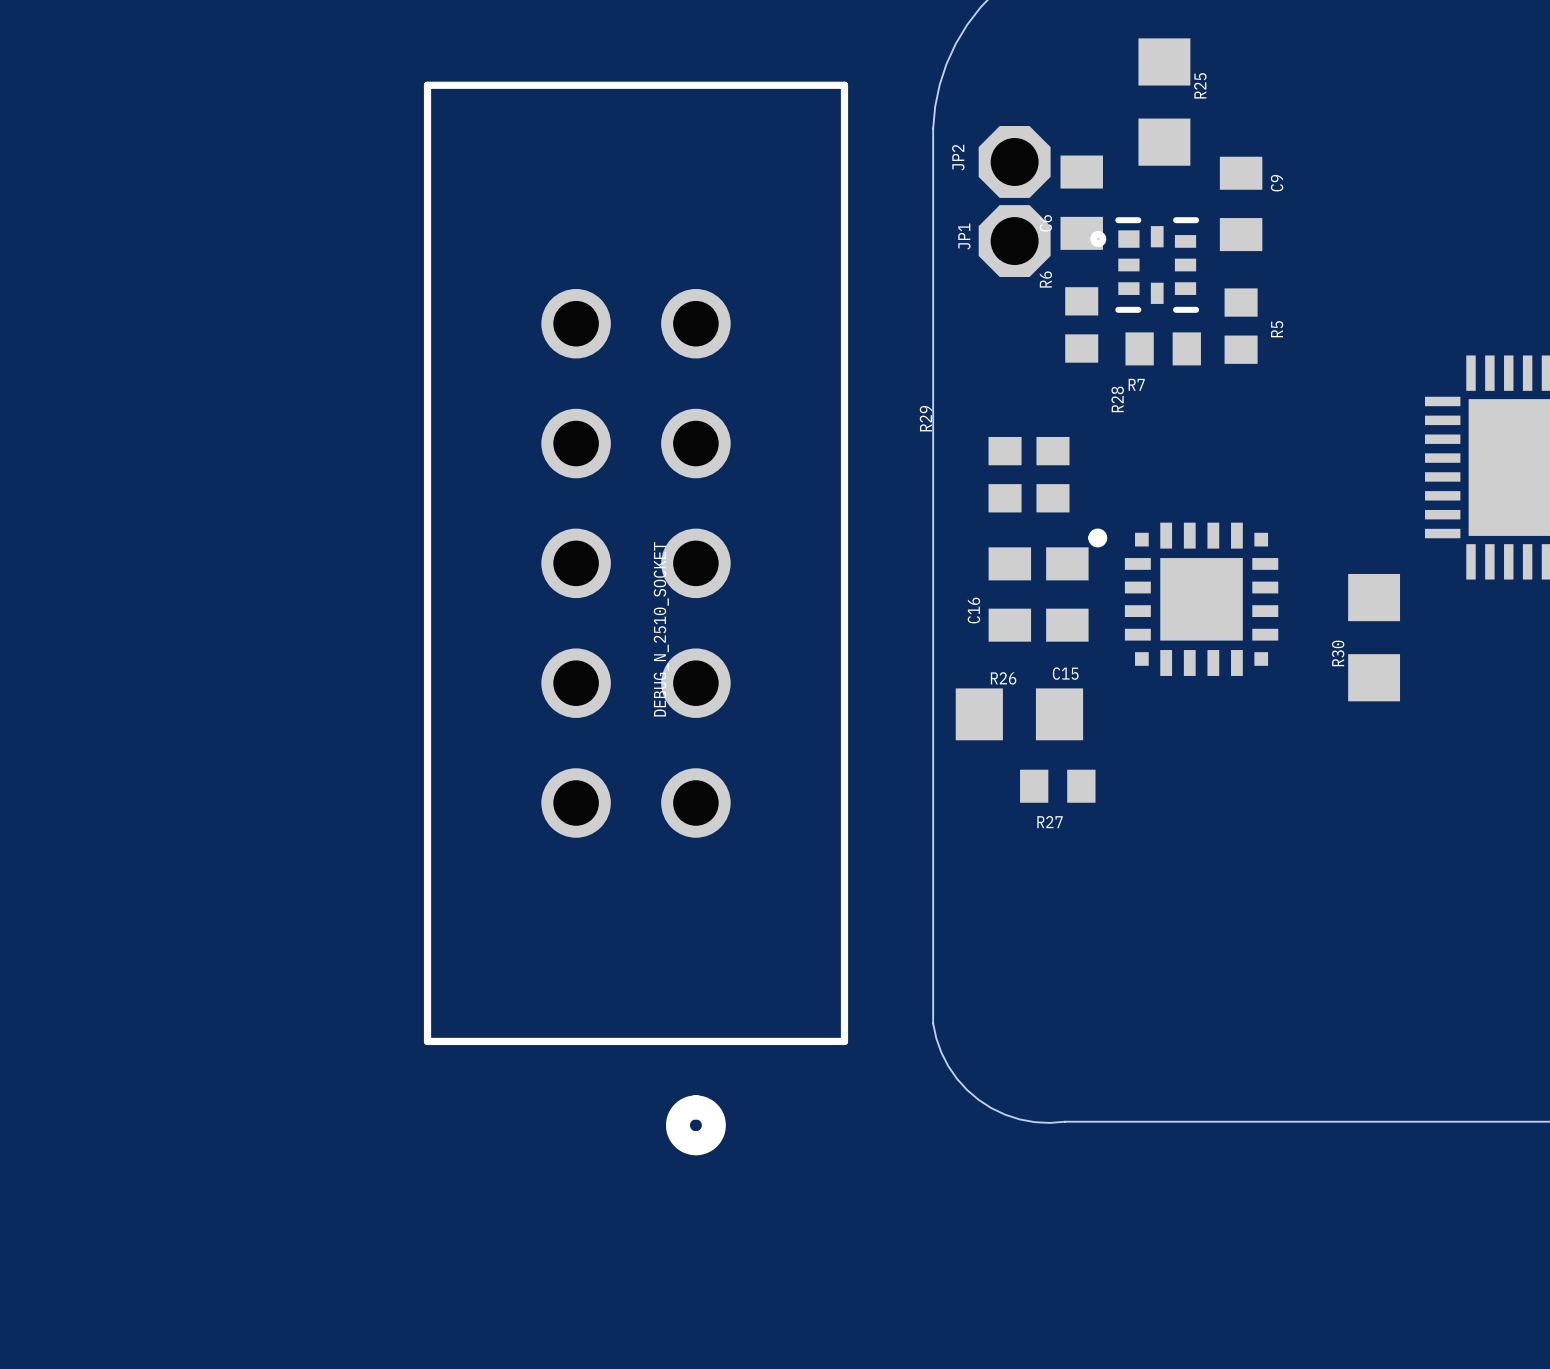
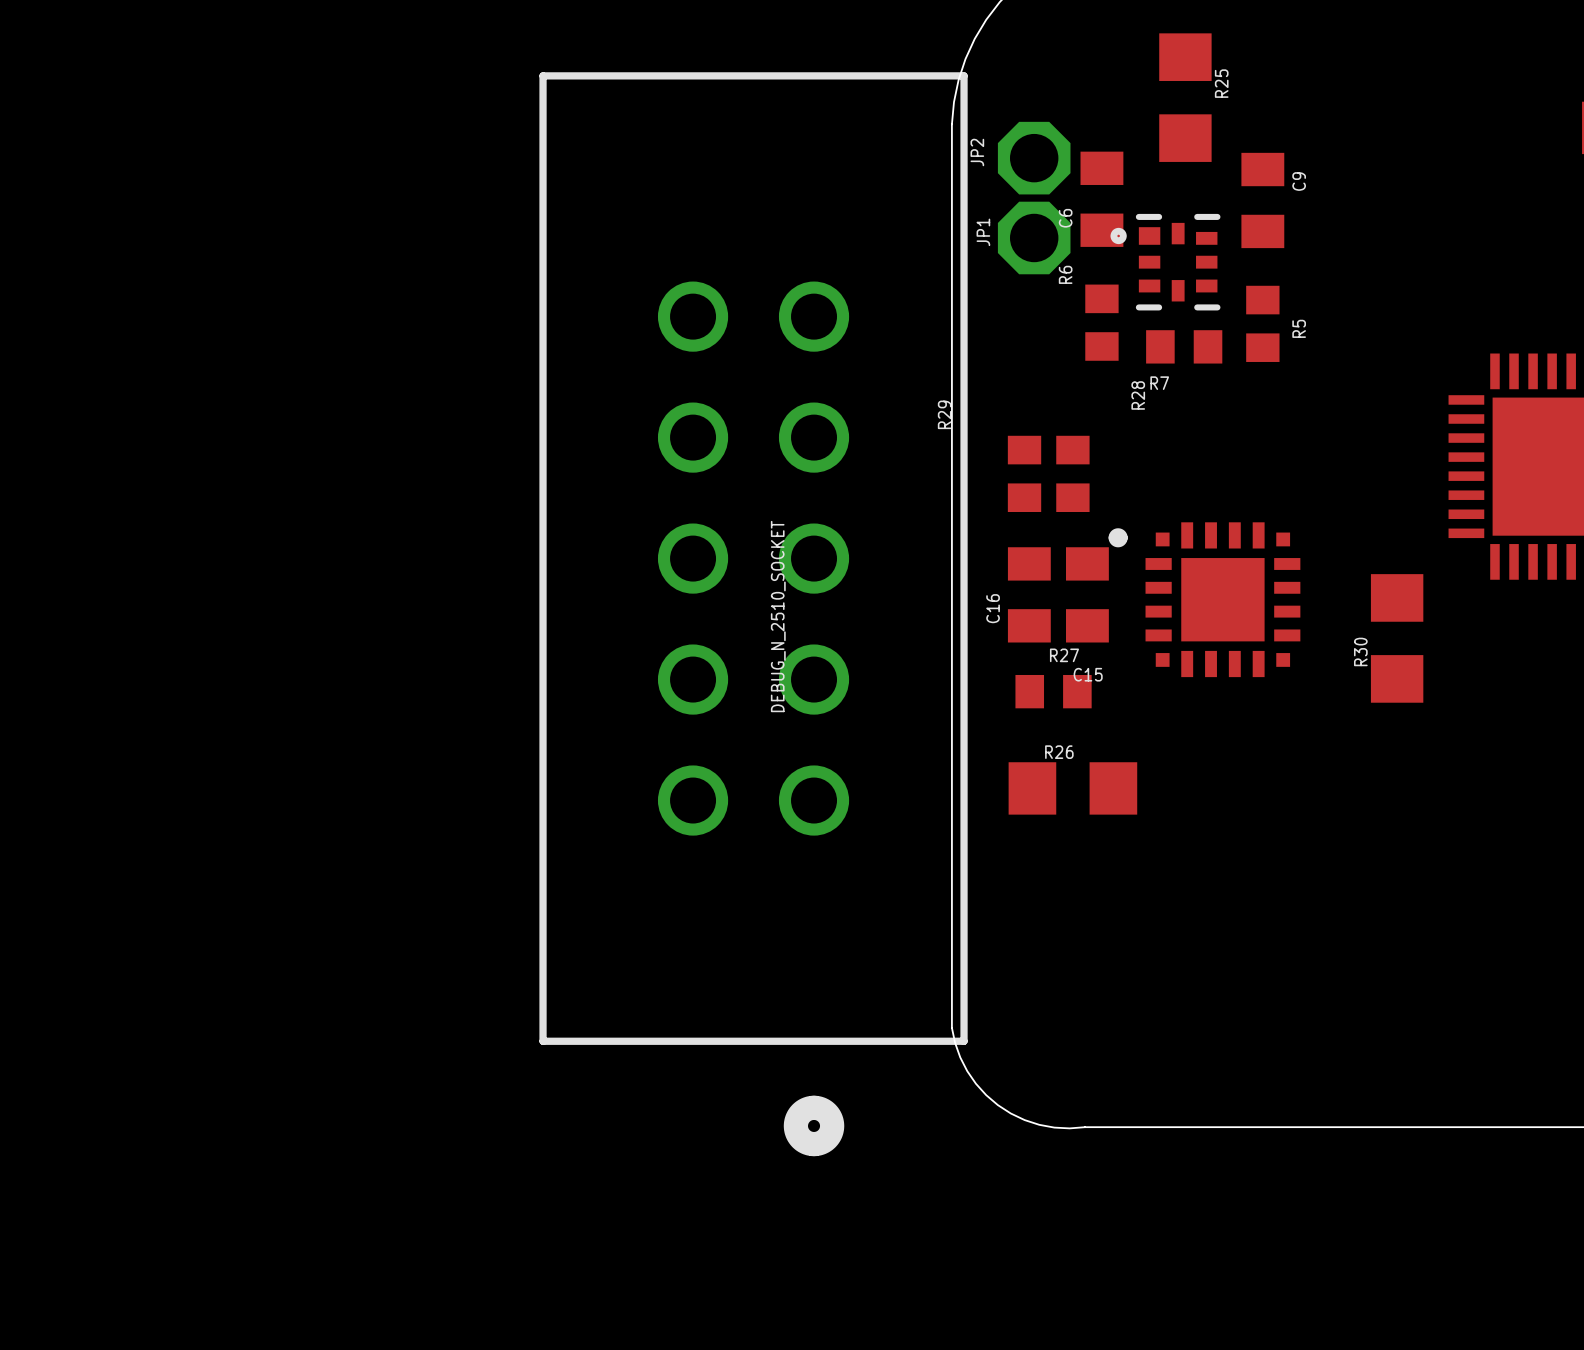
DEBUG_N_2510_SOCKET position: (636, 618) -> (753, 614)
R26 position: (1019, 714) -> (1072, 788)
R27 position: (1057, 786) -> (1053, 691)
R27 name position: R27 (1050, 822) -> R27 (1064, 655)

